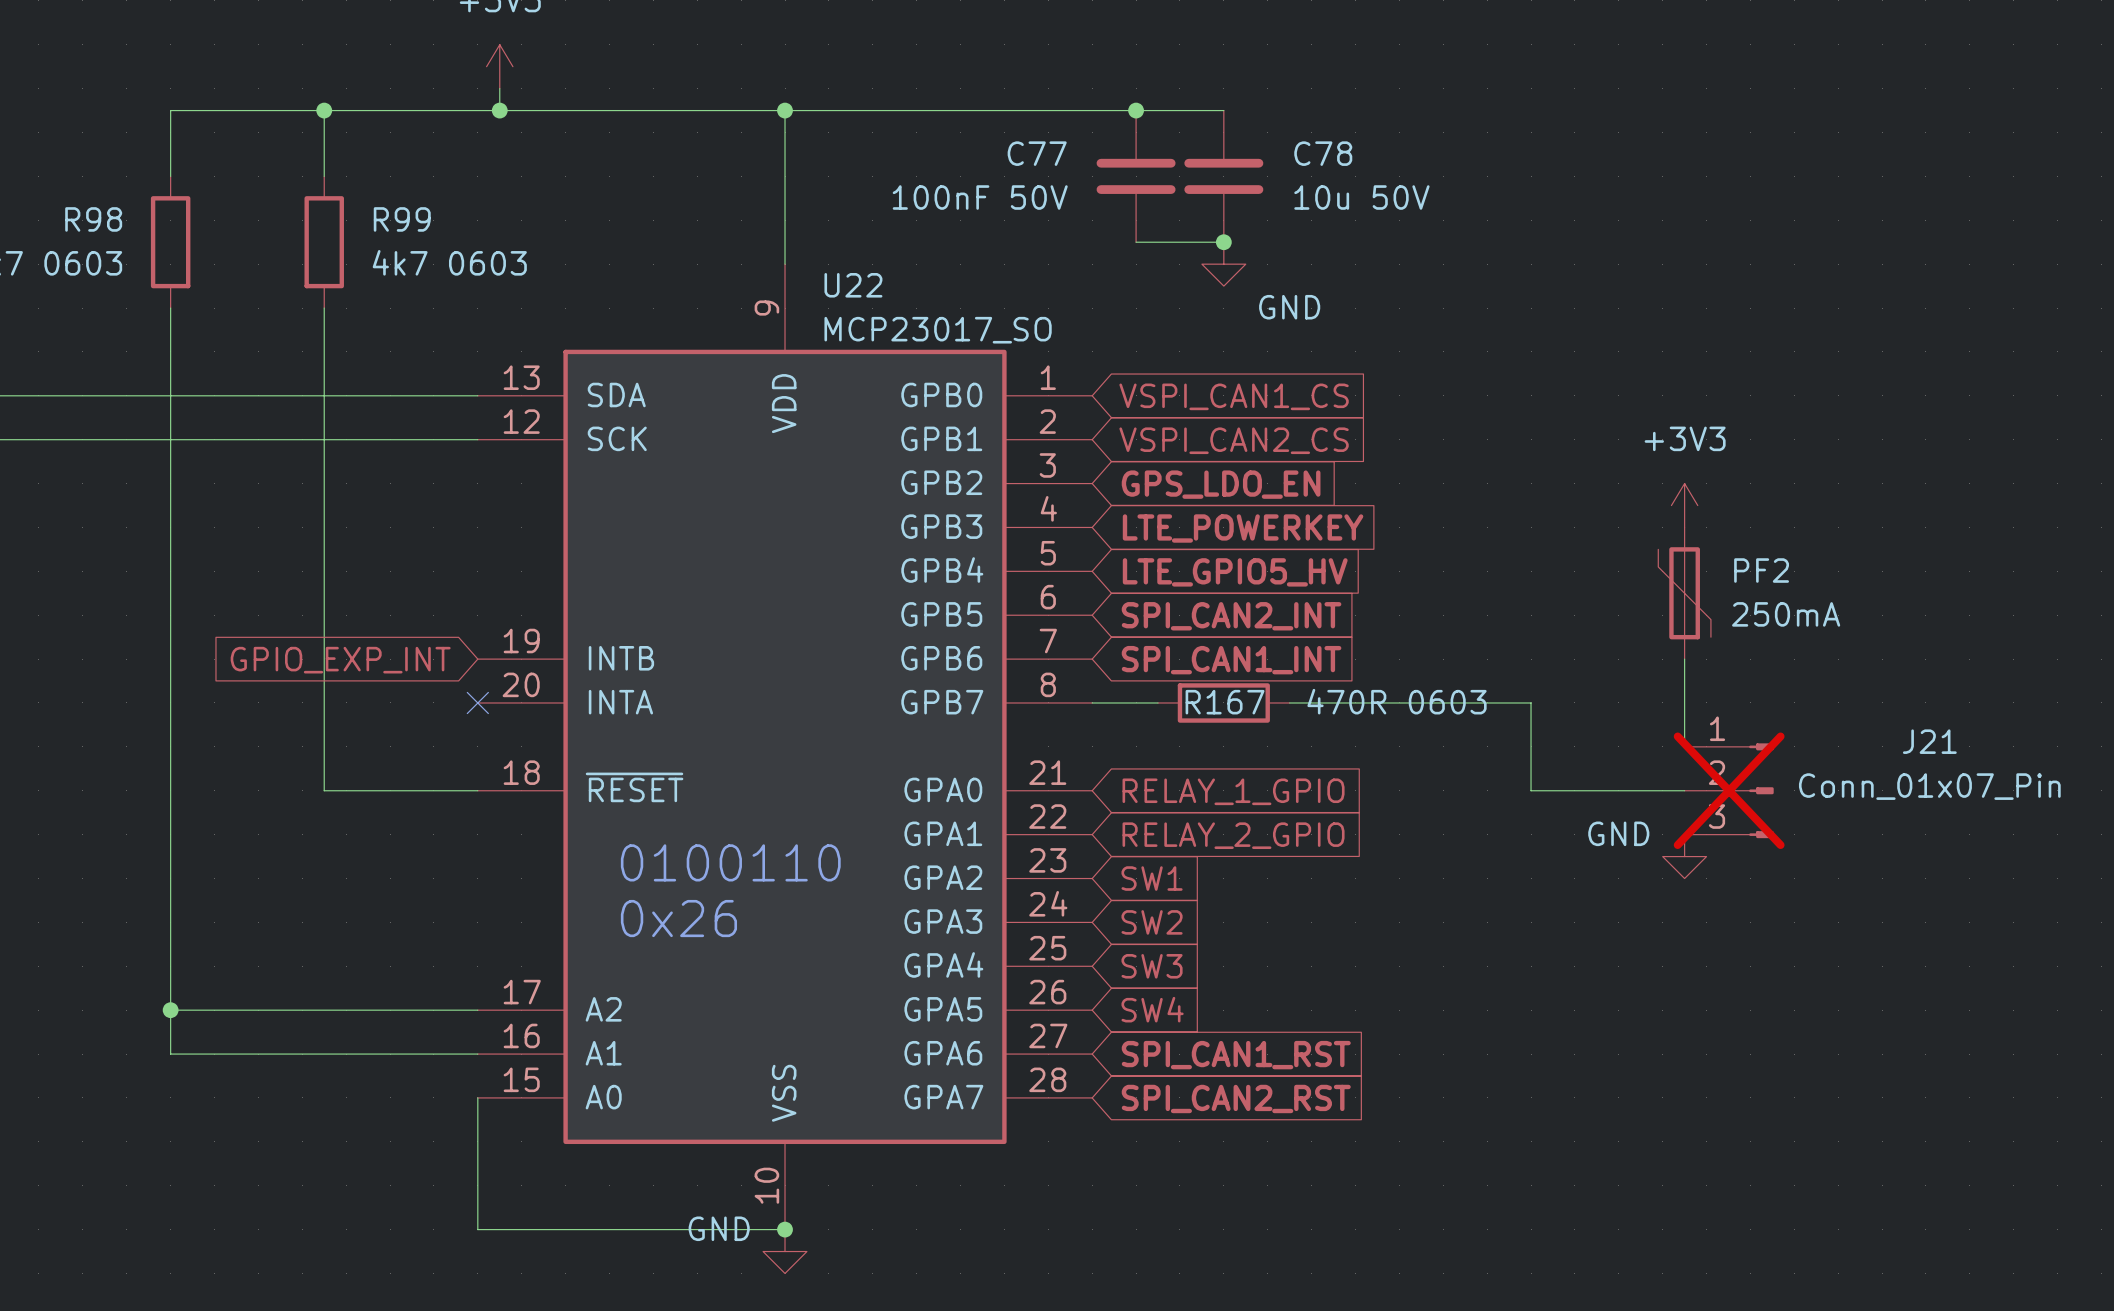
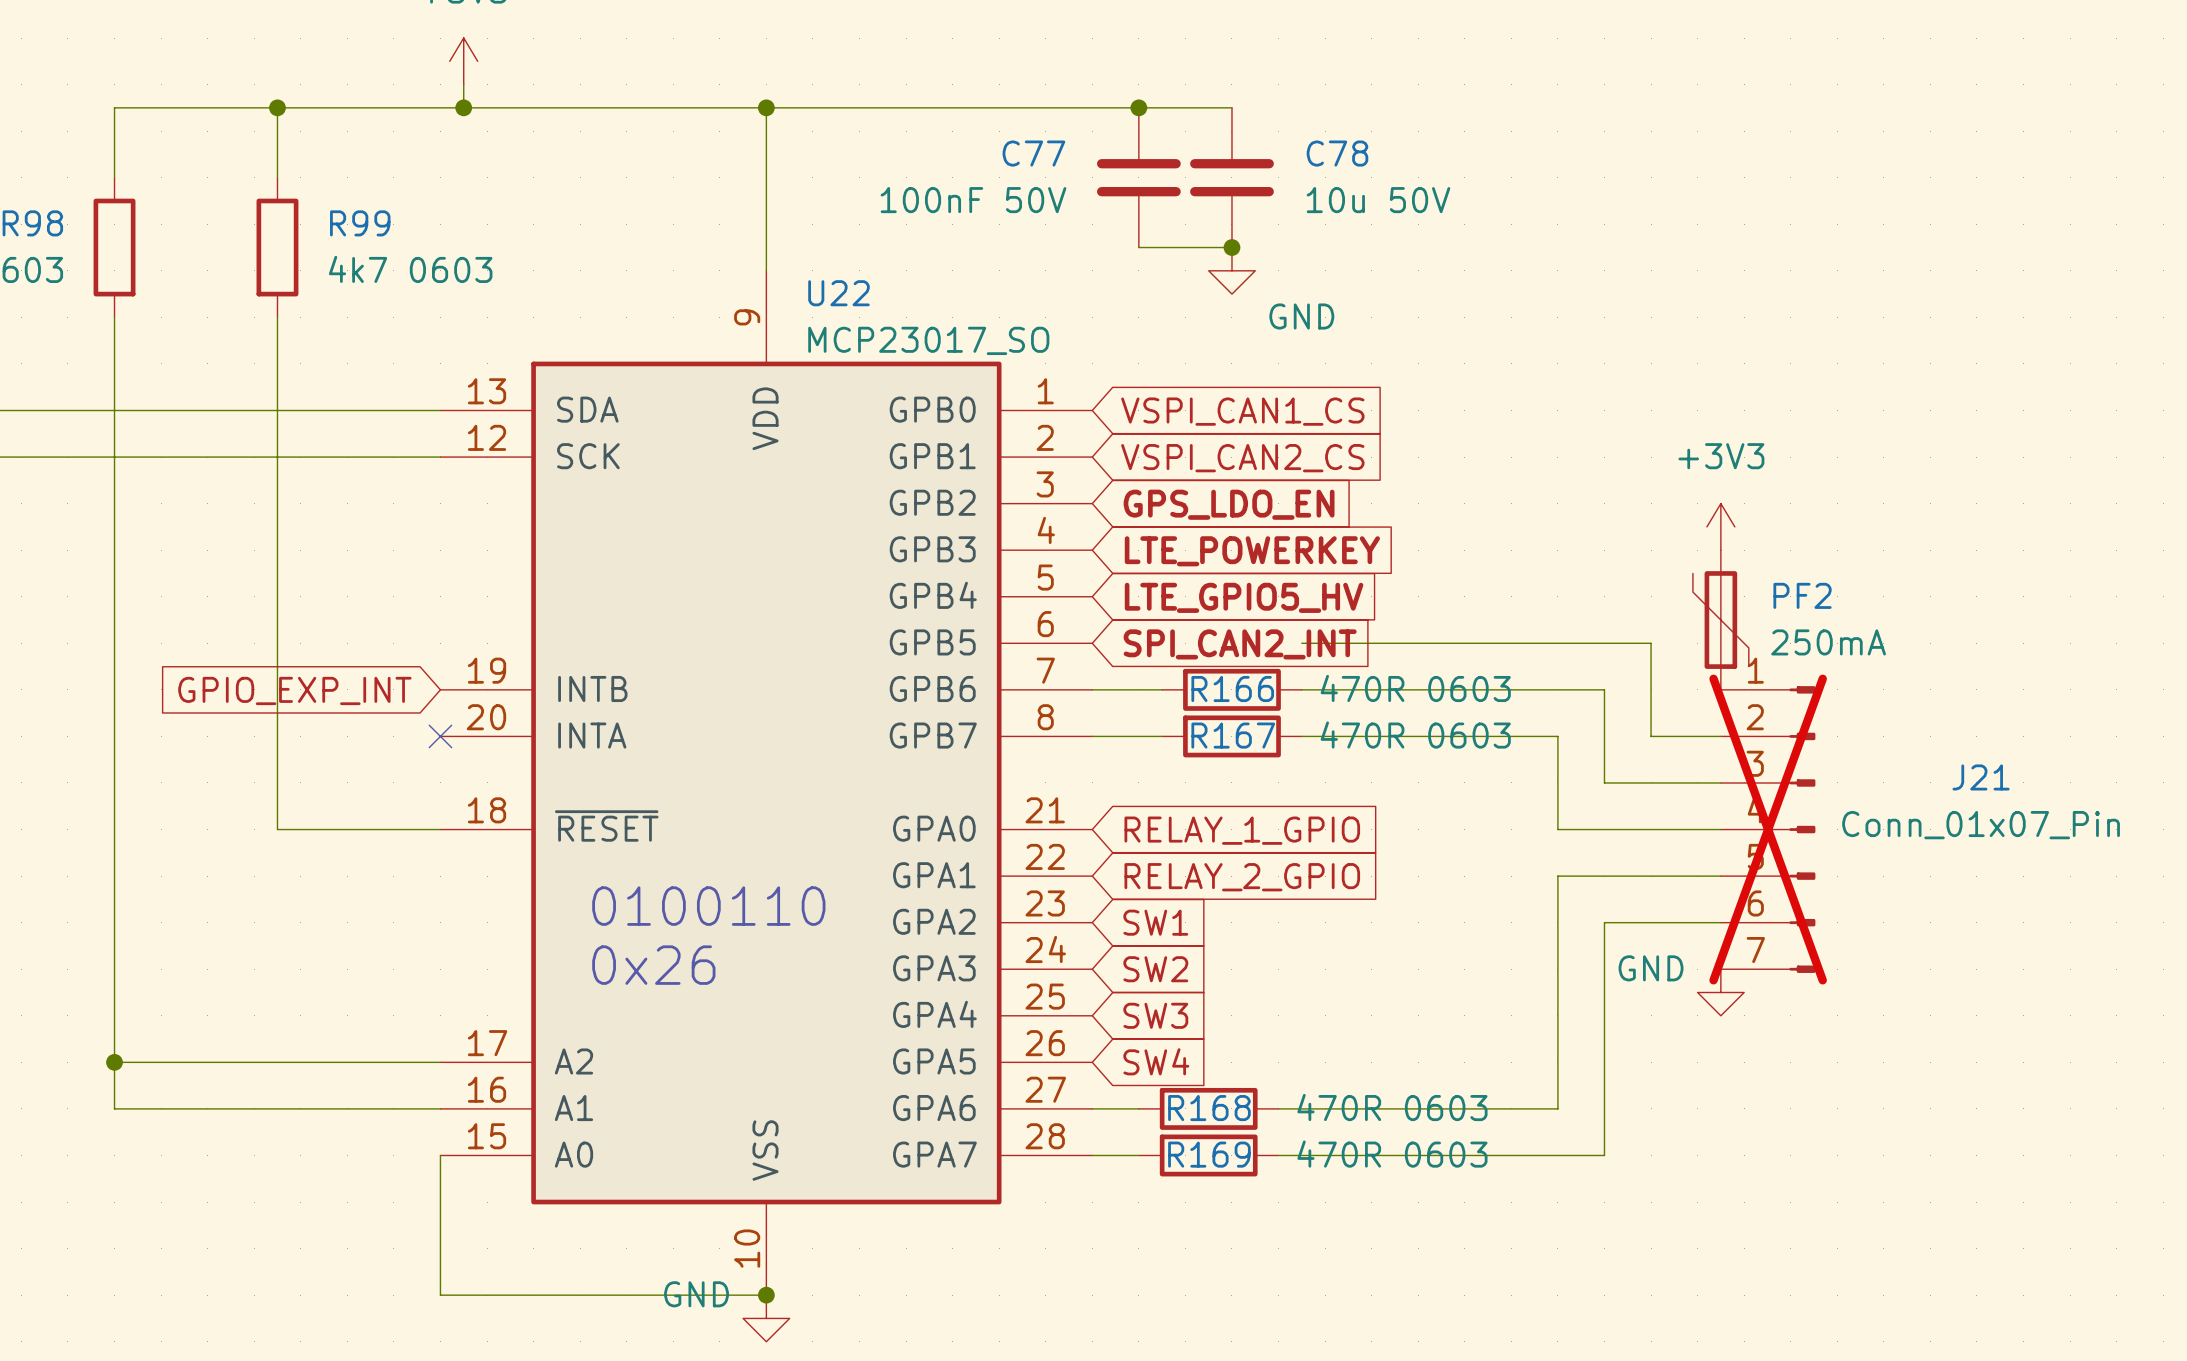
wire: none -> (1301, 643) (1651, 643) (1651, 736) (1720, 736)
wire: none -> (1092, 689) (1162, 689)
R166: none -> 470R 0603 (1231, 689)
wire: (1684, 659) (1684, 746) -> (1301, 689) (1604, 689) (1604, 782) (1720, 782)
global label: SPI_CAN1_INT (1231, 660) -> none
J21 symbol: [1684, 743, 1774, 839] -> [1720, 686, 1816, 973]
wire: none -> (1720, 876) (1557, 876) (1557, 1108) (1278, 1108)
power symbol position: GND (1684, 856) -> GND (1720, 992)
wire: none -> (1720, 922) (1604, 922) (1604, 1155) (1278, 1155)
wire: none -> (1092, 1108) (1138, 1108)
R168: none -> 470R 0603 (1208, 1108)
global label: SPI_CAN1_RST (1236, 1055) -> none
wire: none -> (1092, 1155) (1138, 1155)
R169: none -> 470R 0603 (1208, 1155)
global label: SPI_CAN2_RST (1236, 1098) -> none

